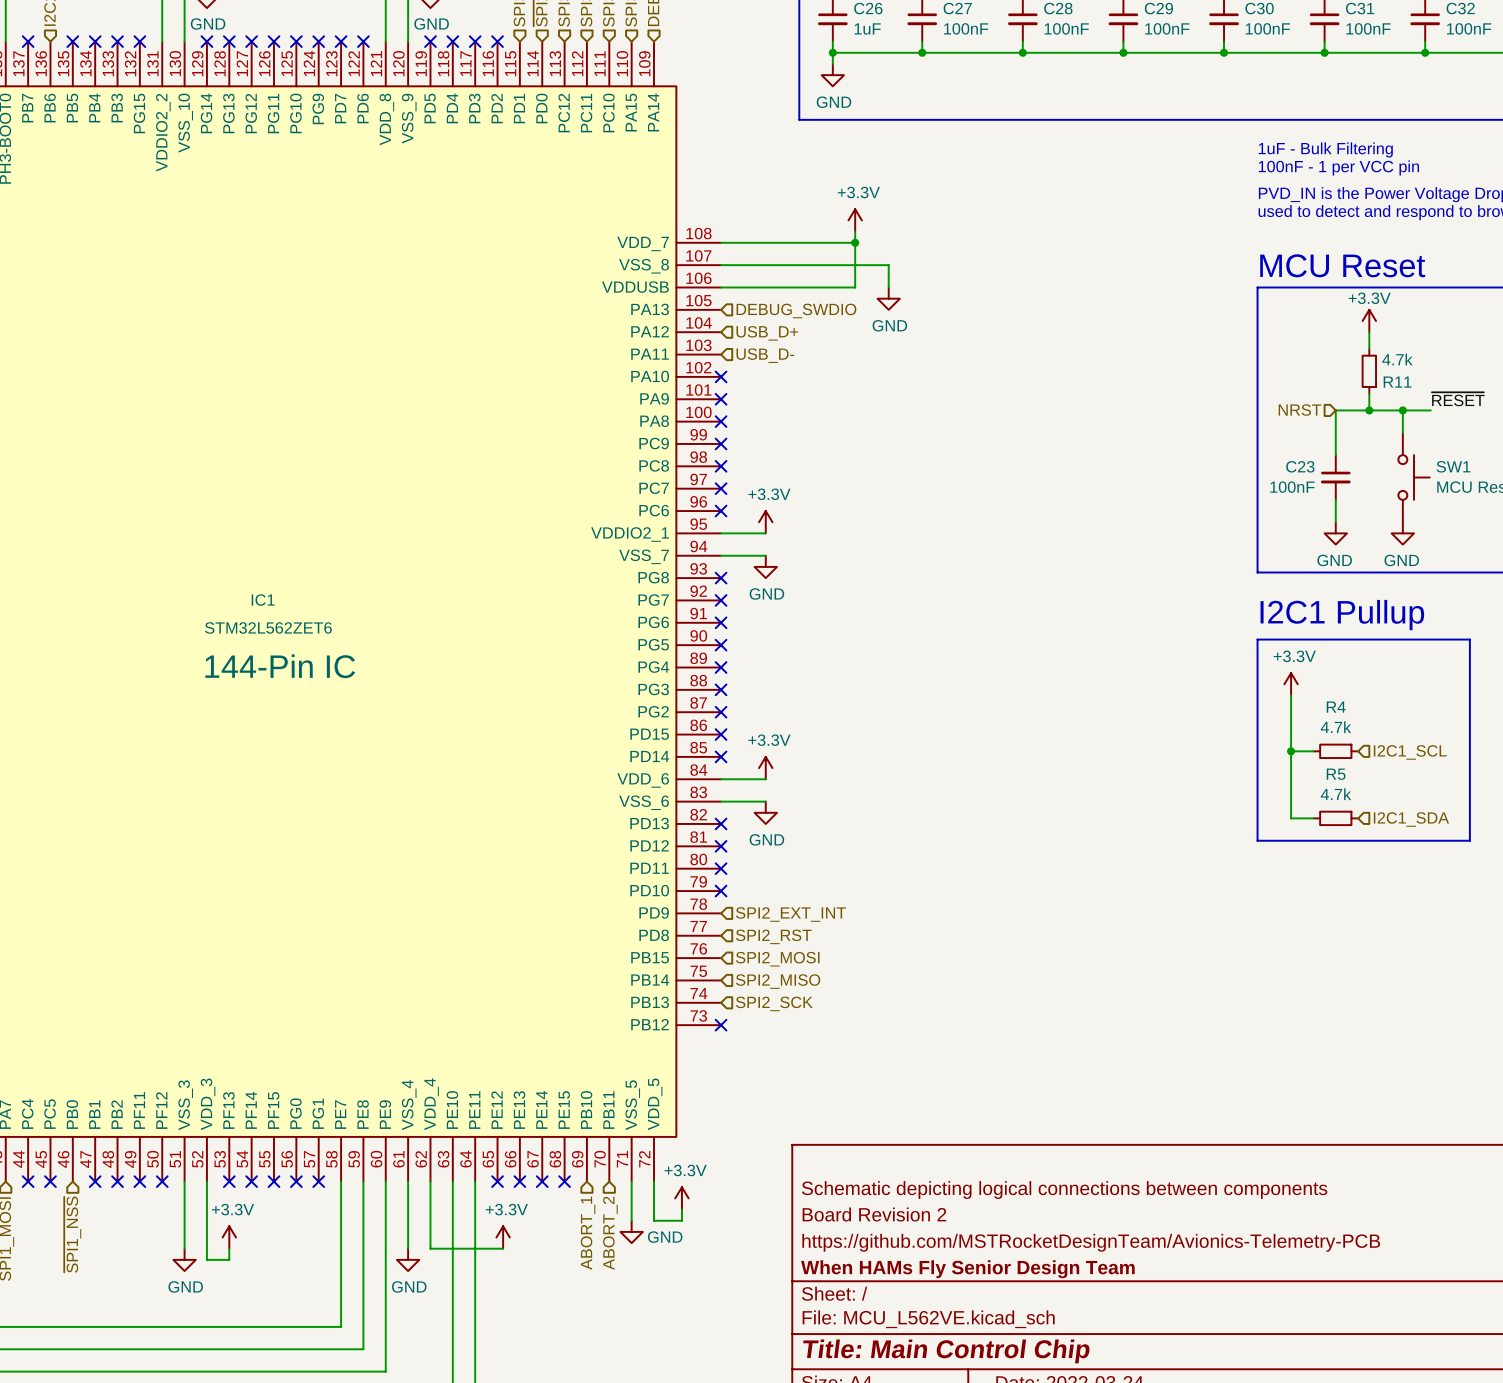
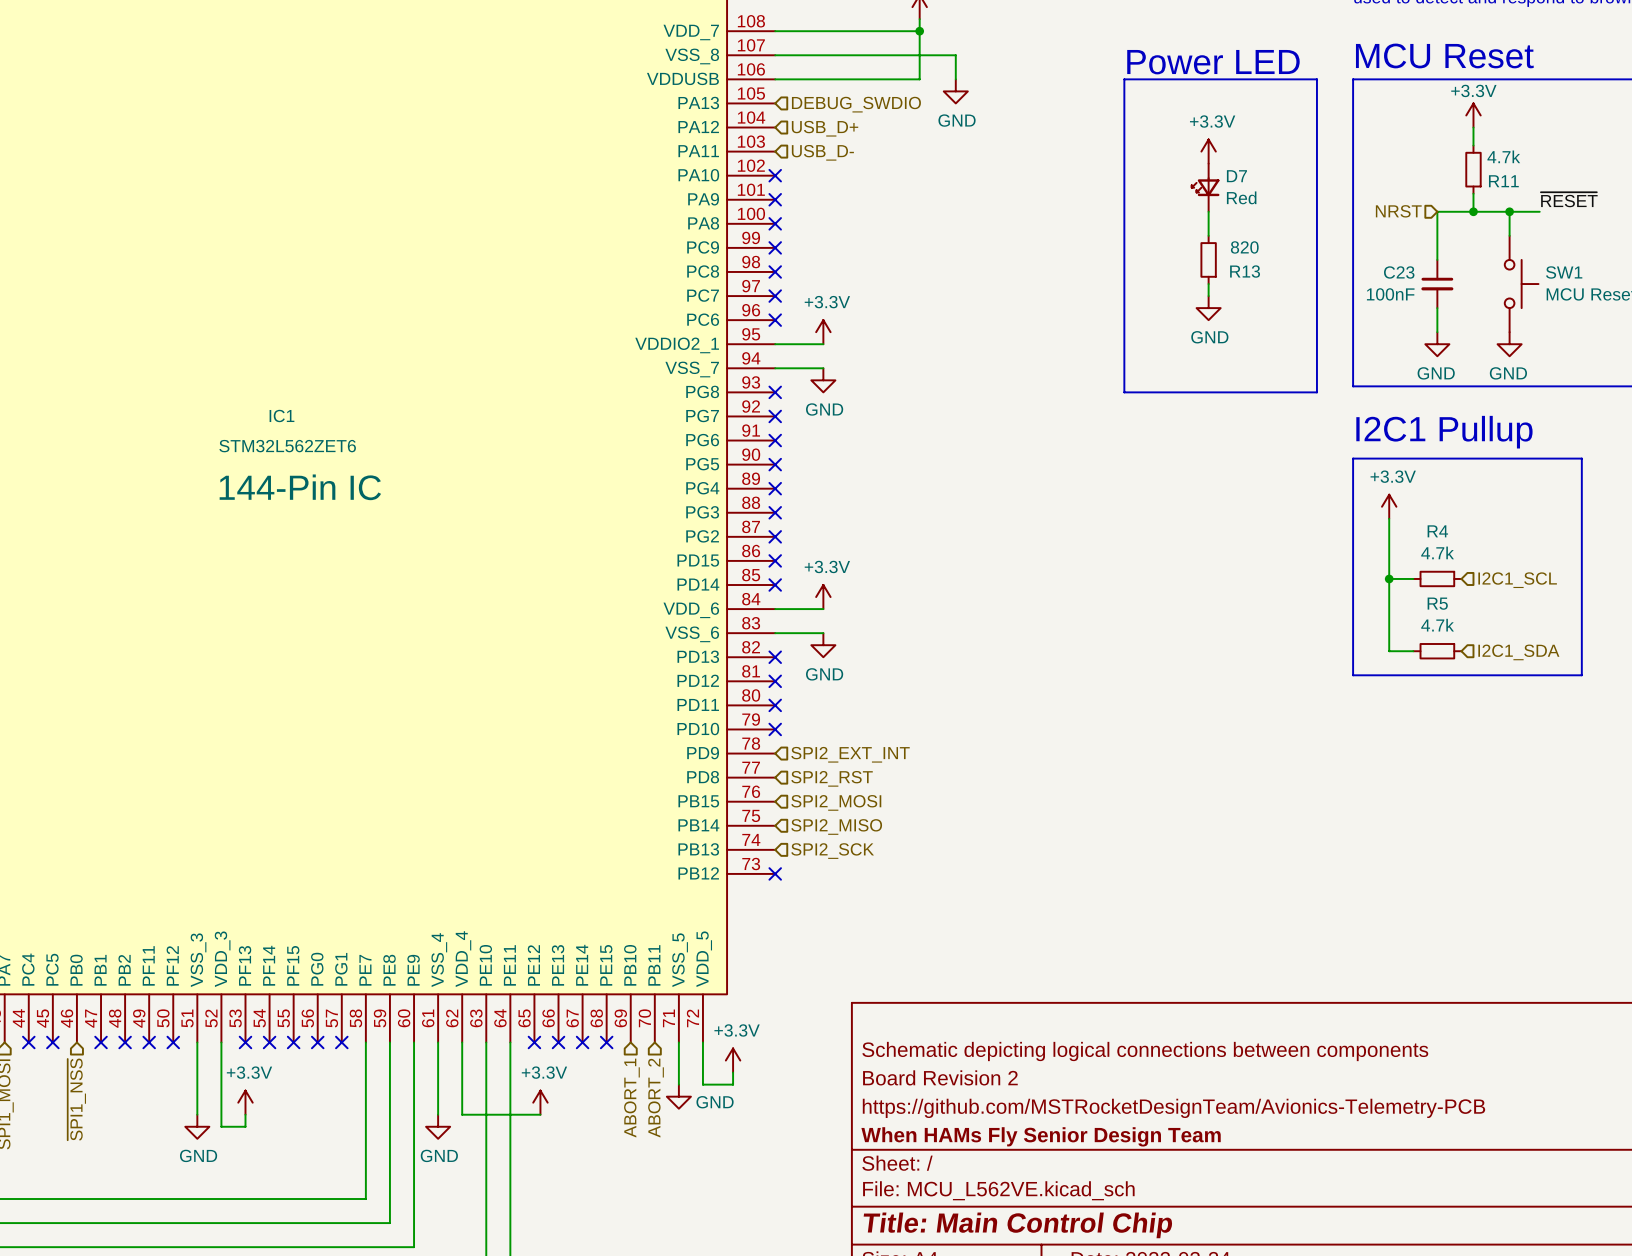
text: none -> Power LED (1213, 62)
line: none -> (1124, 79) (1316, 79) (1316, 392) (1124, 392) (1124, 79)
power symbol: none -> +3.3V (1208, 151)
D7: none -> Red (1205, 187)
wire: none -> (1208, 211) (1208, 235)
R13: none -> 820 (1208, 259)
wire: none -> (1208, 284) (1208, 296)
power symbol: none -> GND (1208, 308)

